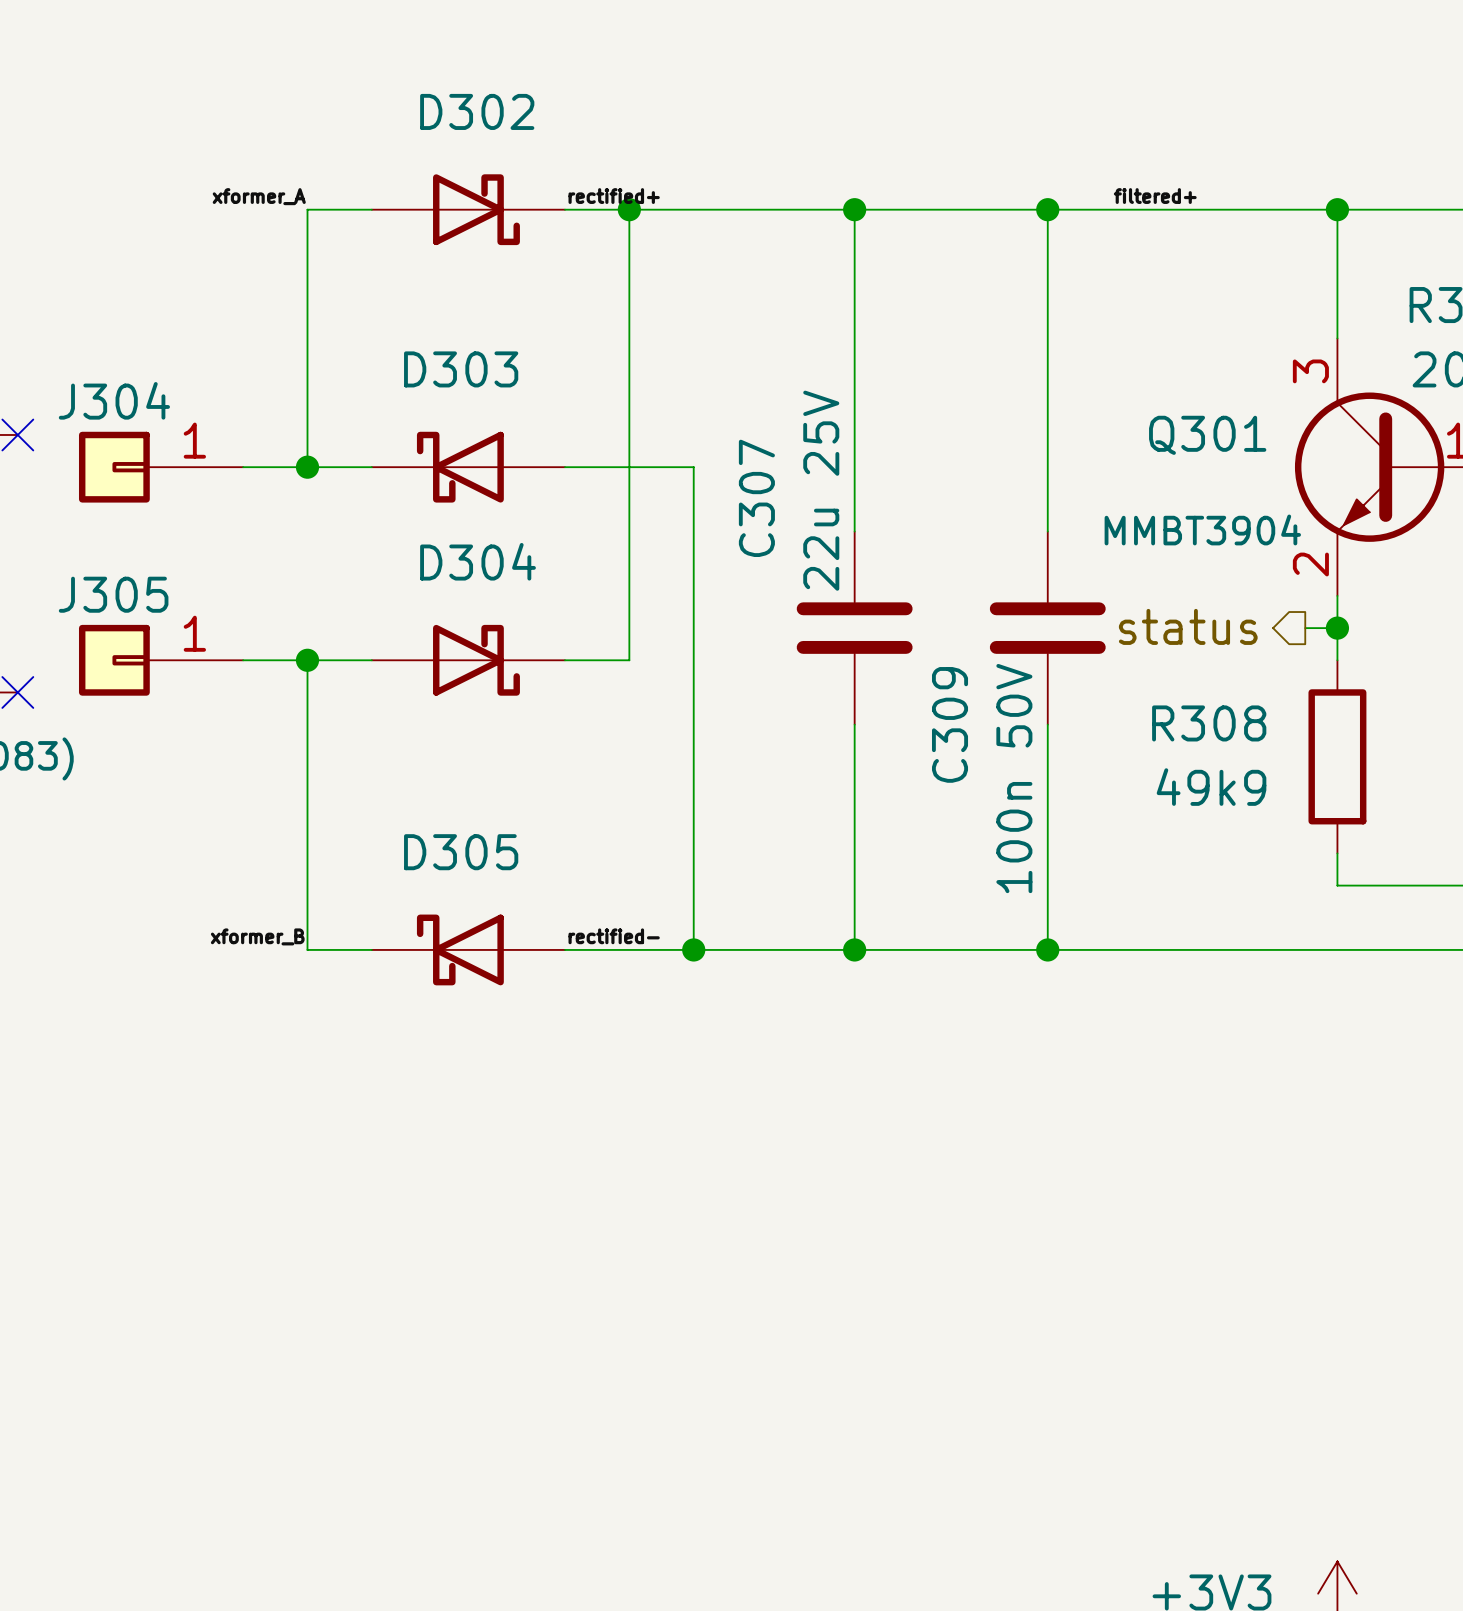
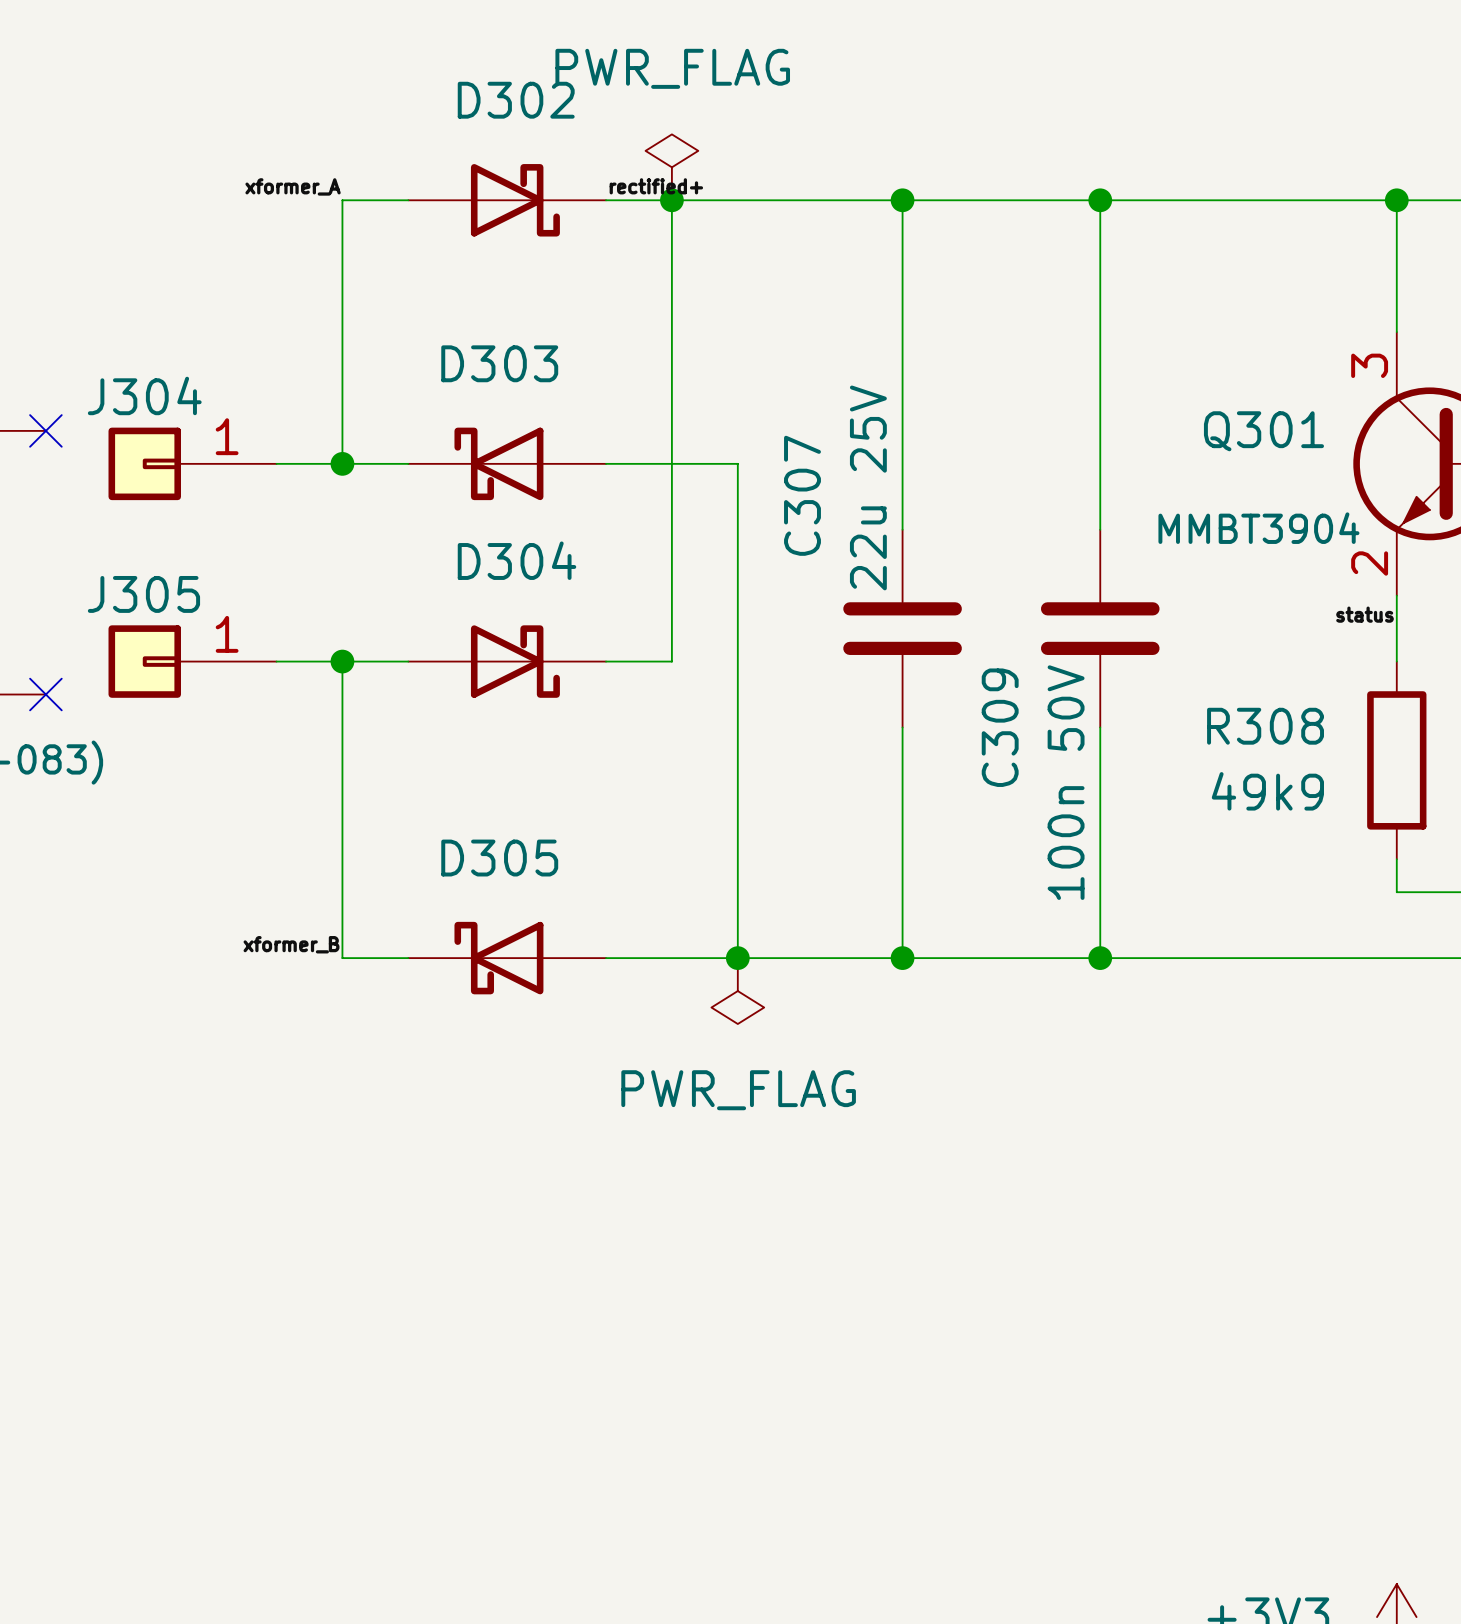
power symbol: none -> PWR_FLAG (671, 167)
label: filtered+ (1155, 196) -> none
label: none -> status (1365, 614)
hierarchical label: status (1188, 626) -> none
wire: (1305, 628) (1337, 628) -> none
junction: (1337, 628) -> none
label: rectified- (614, 936) -> none
power symbol: none -> PWR_FLAG (737, 991)

